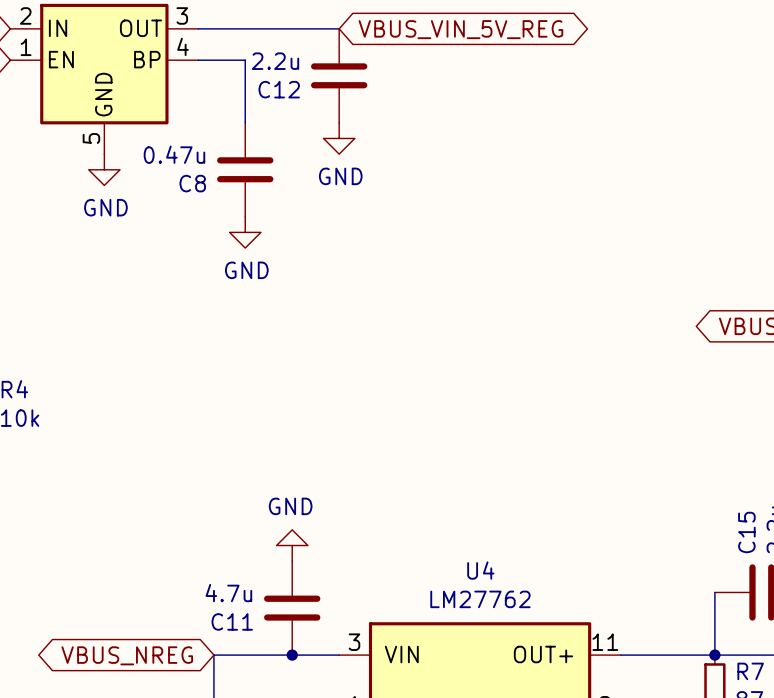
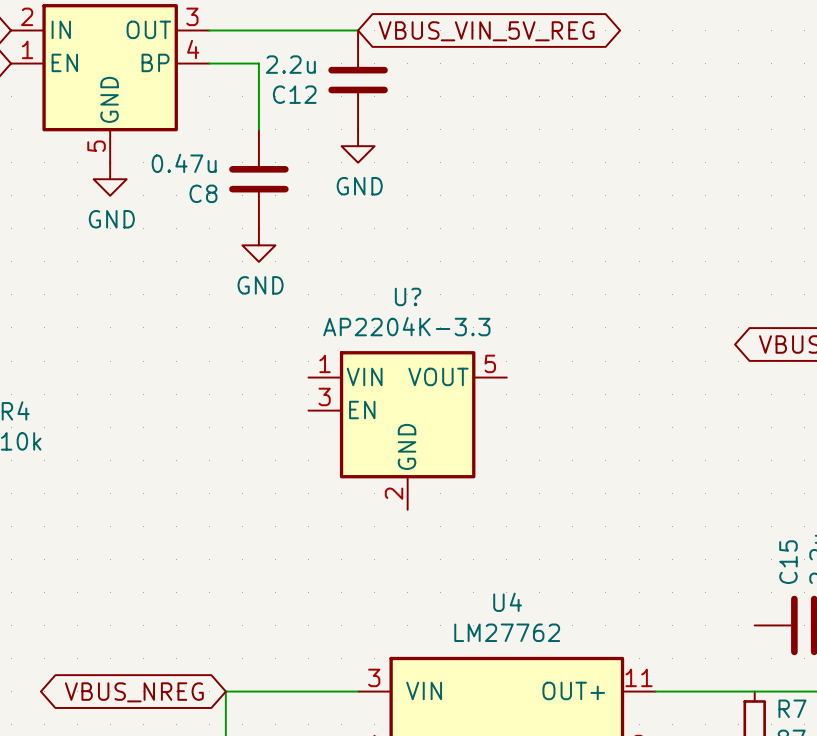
U?: none -> AP2204K-3.3 (407, 430)
power symbol: GND (292, 545) -> none
wire: (714, 592) (714, 655) -> none
C11: 4.7u (292, 608) -> none
junction: (292, 655) -> none
junction: (714, 655) -> none

